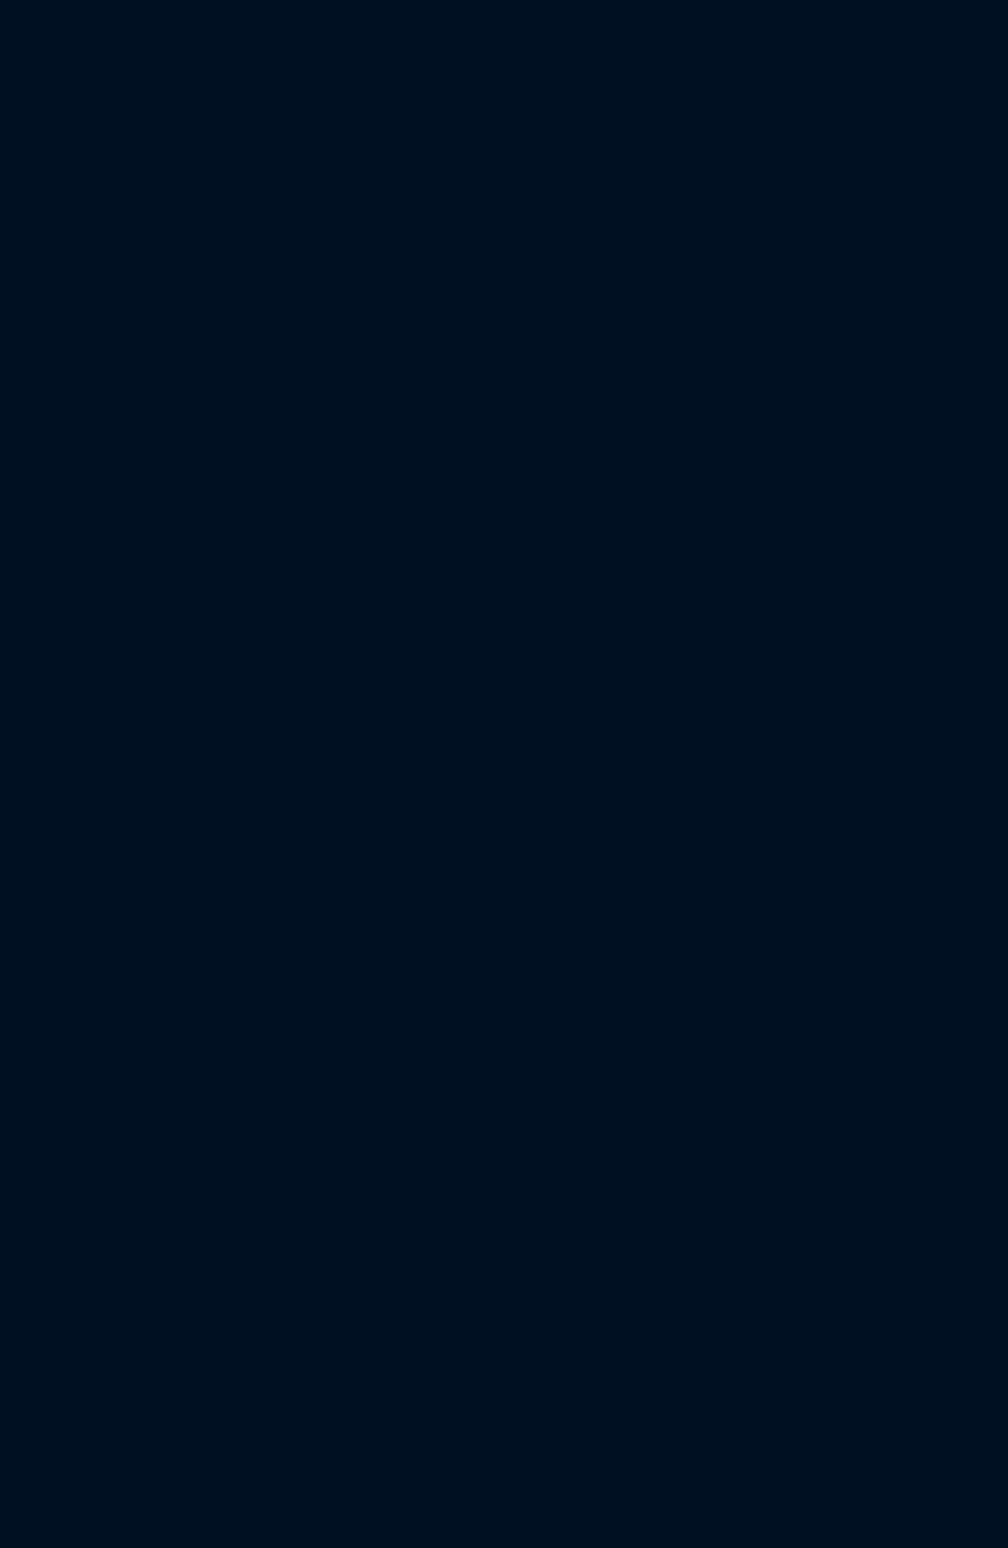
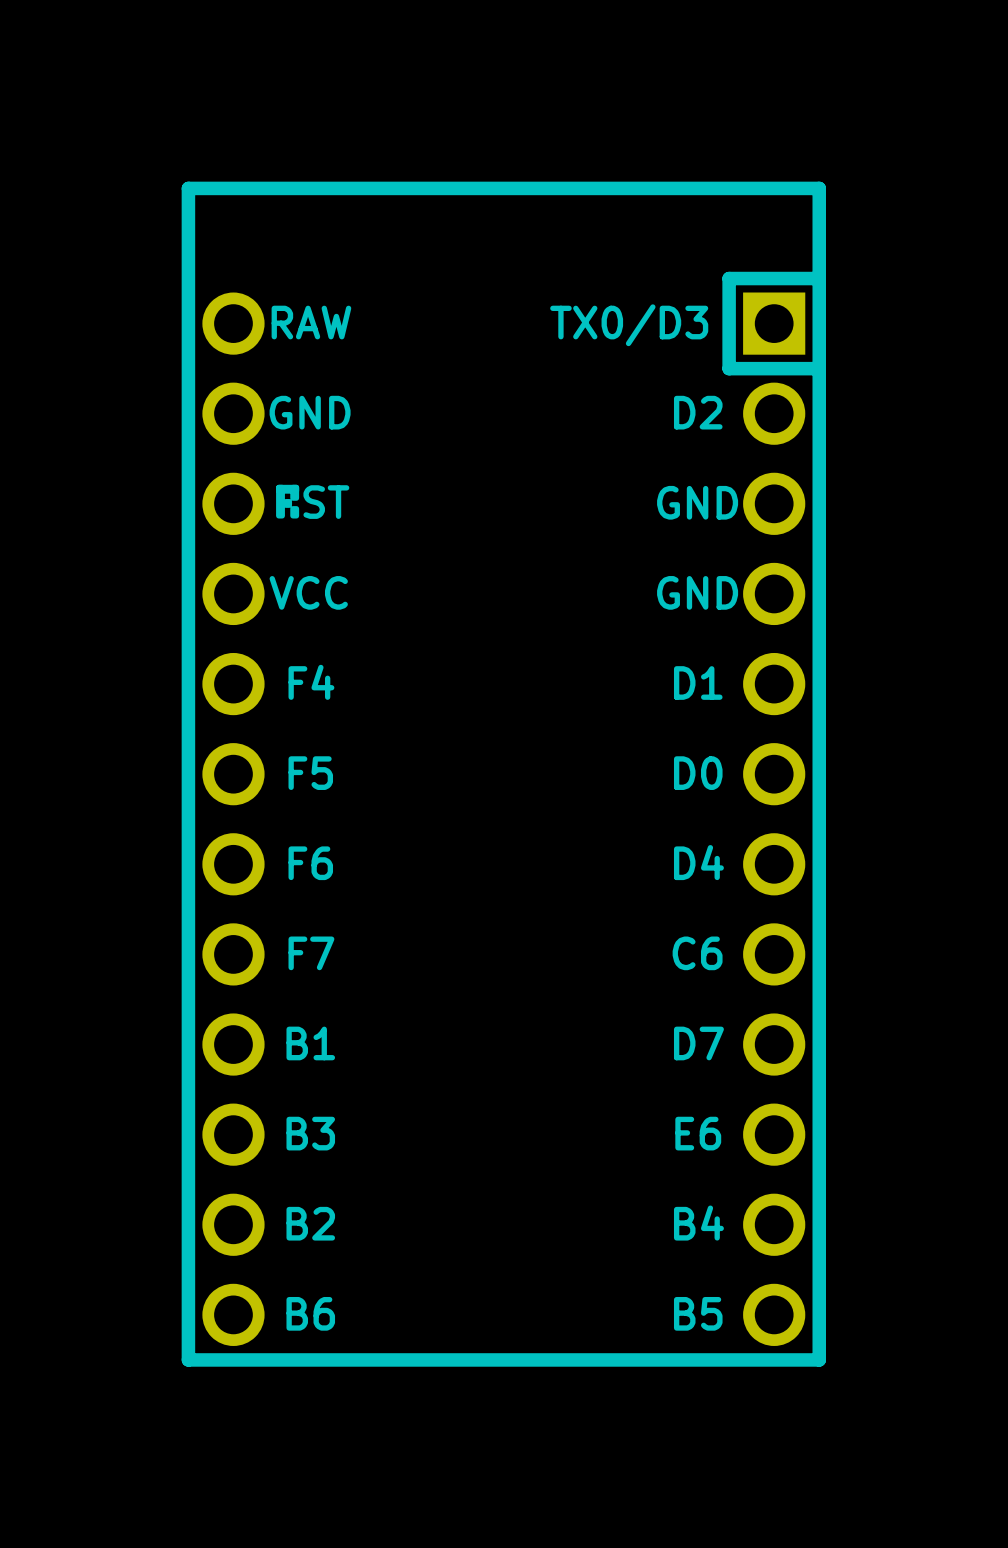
part: none -> (503, 774)

